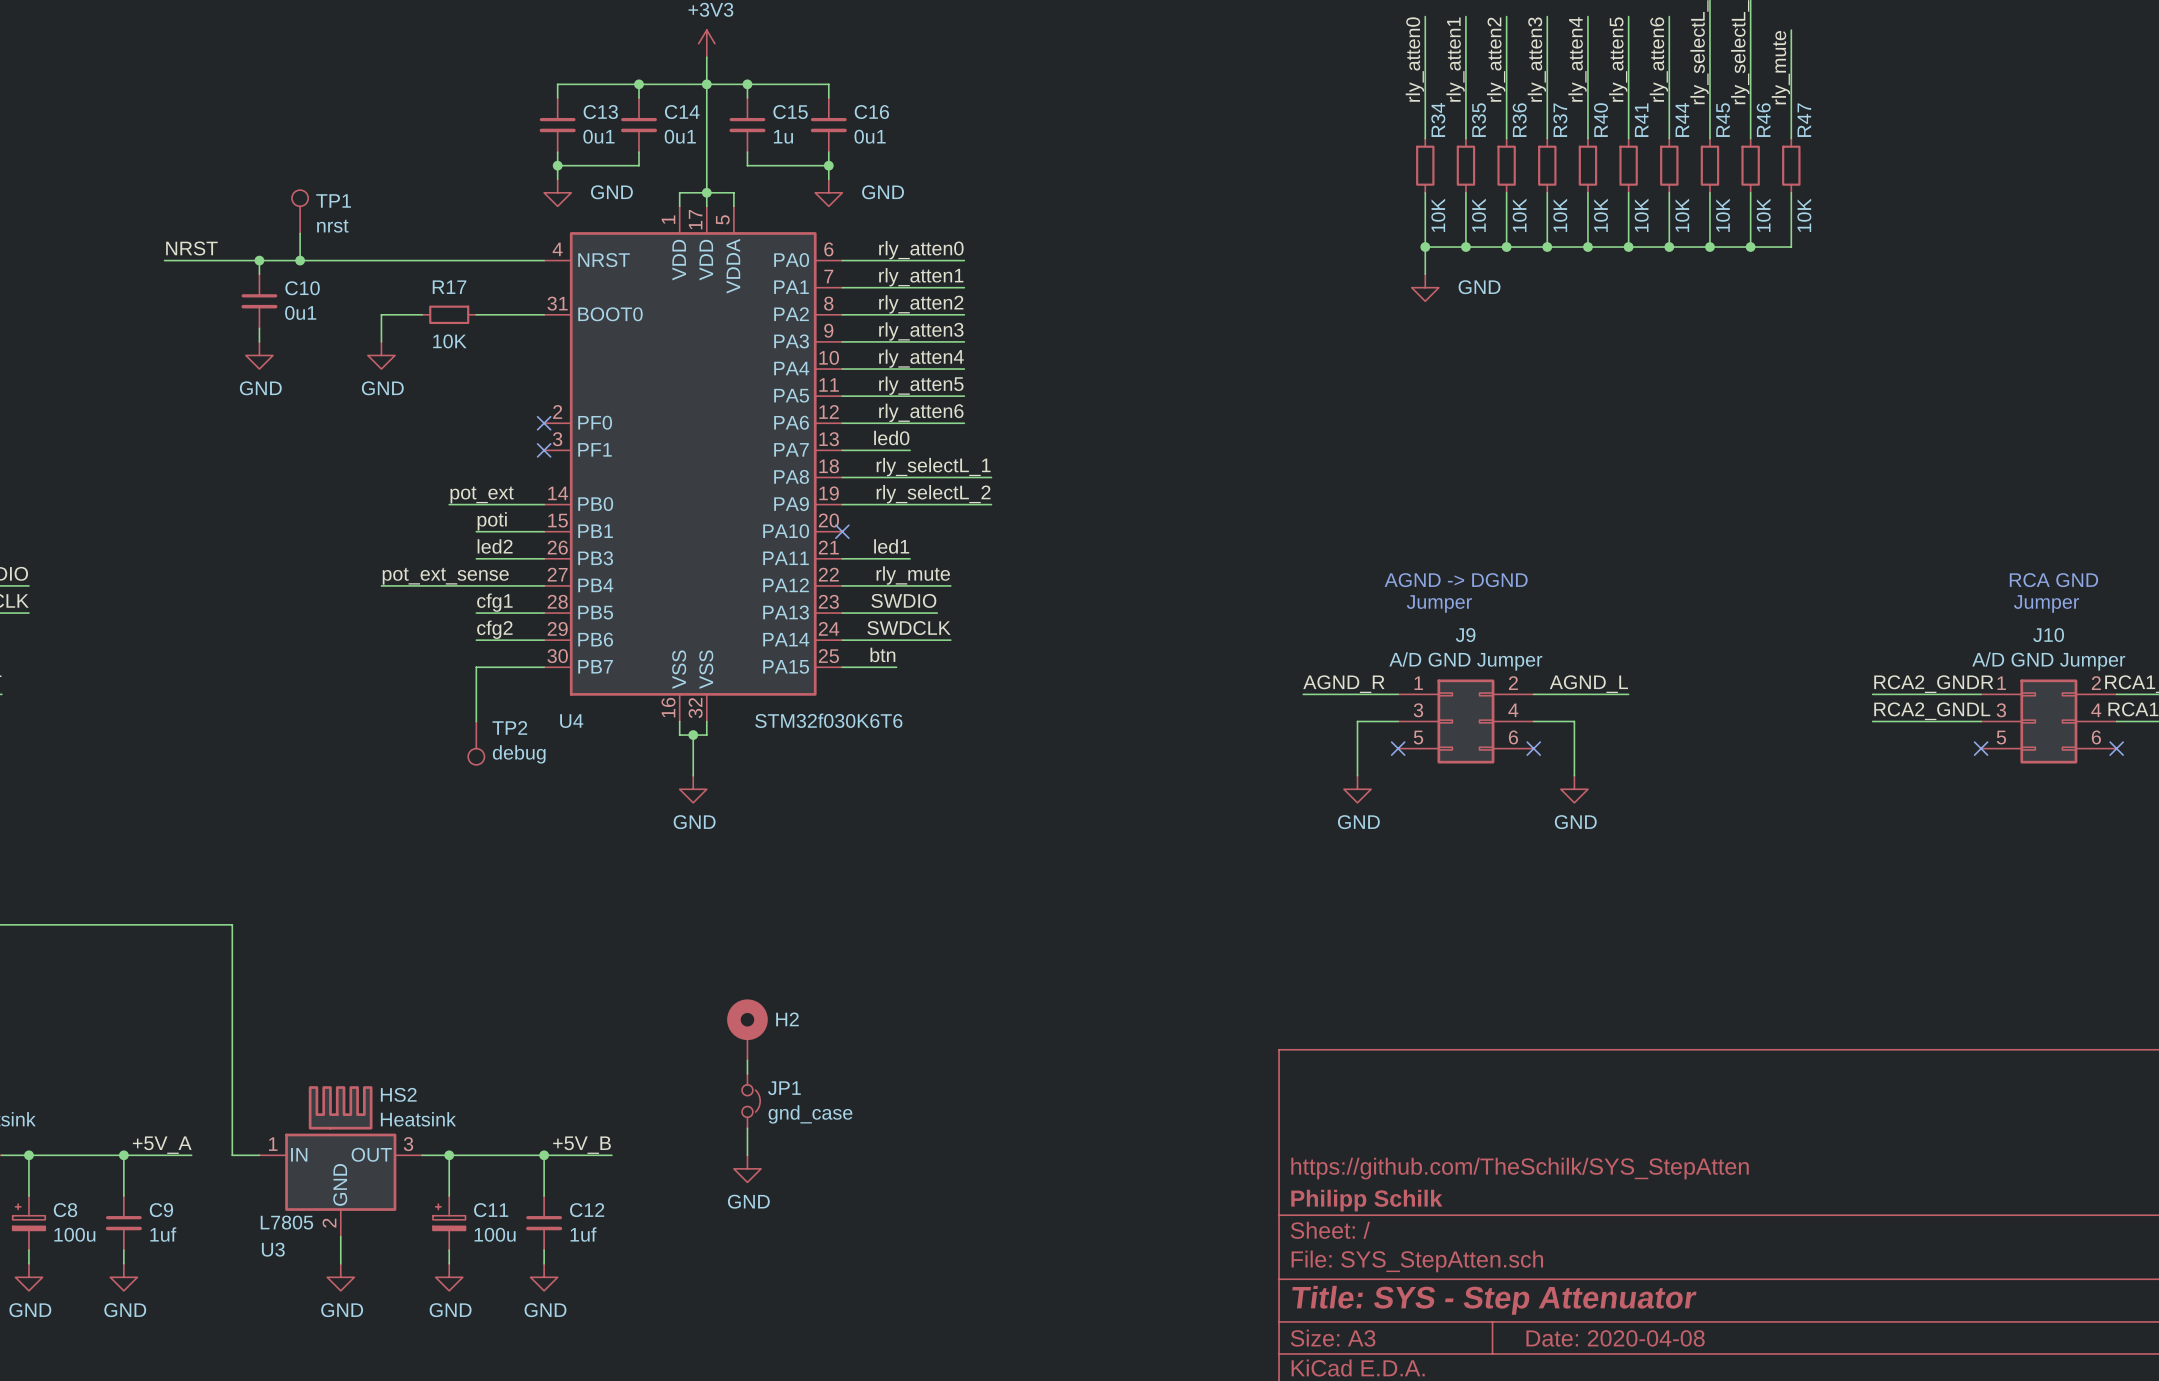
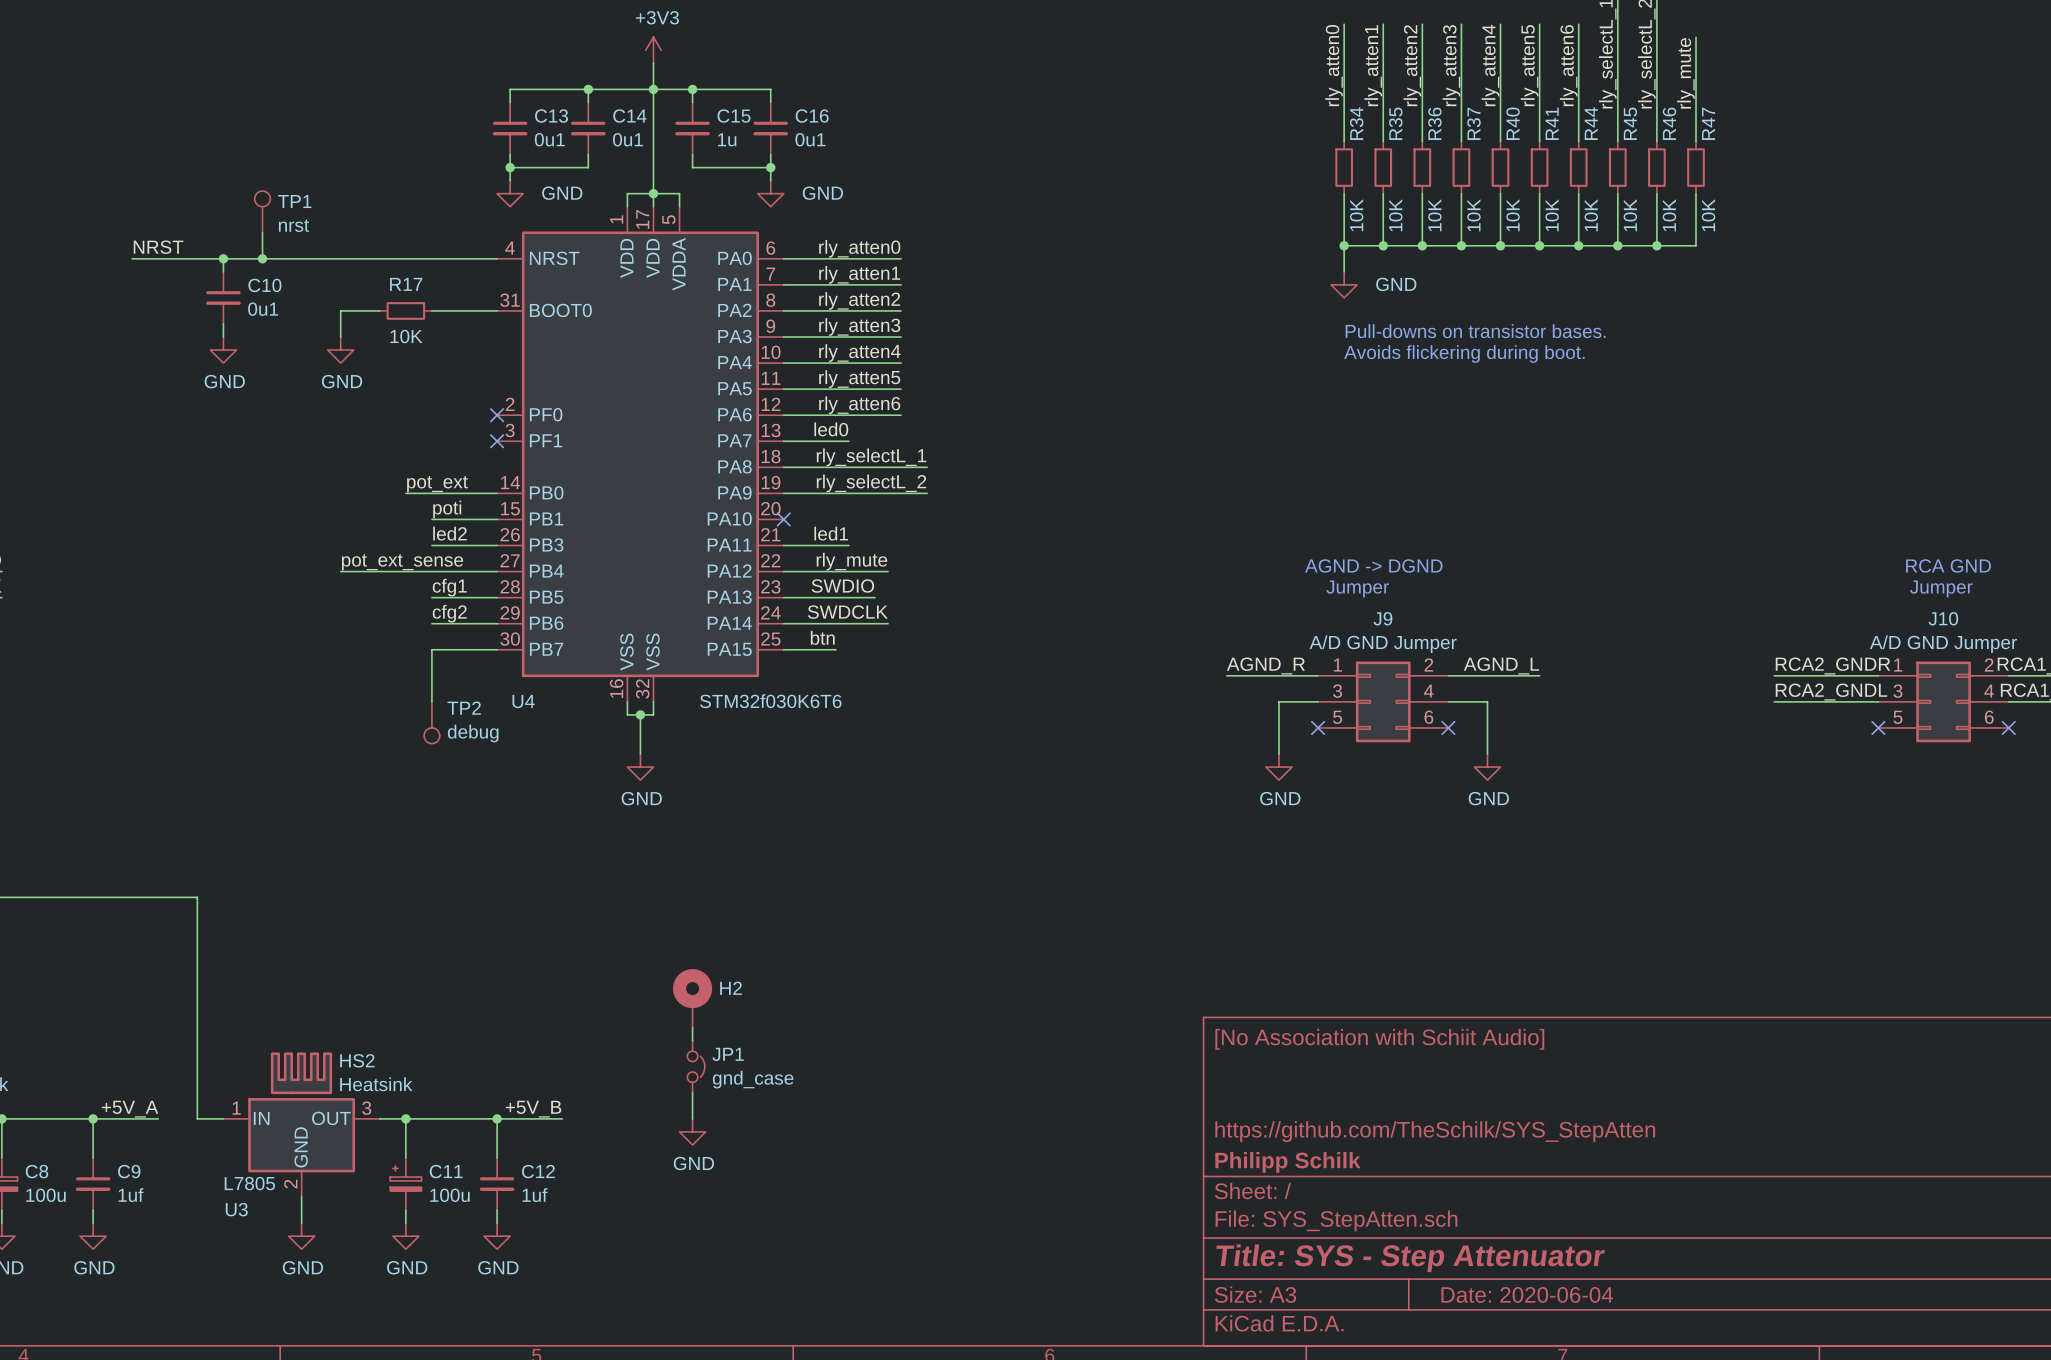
text: none -> Pull-downs on transistor bases. (1475, 331)
text: none -> Avoids flickering during boot. (1464, 354)
title block: none -> [No Association with Schiit Audio] (1379, 1039)
title block: Date: 2020-04-08 (1615, 1338) -> Date: 2020-06-04 (1527, 1294)

